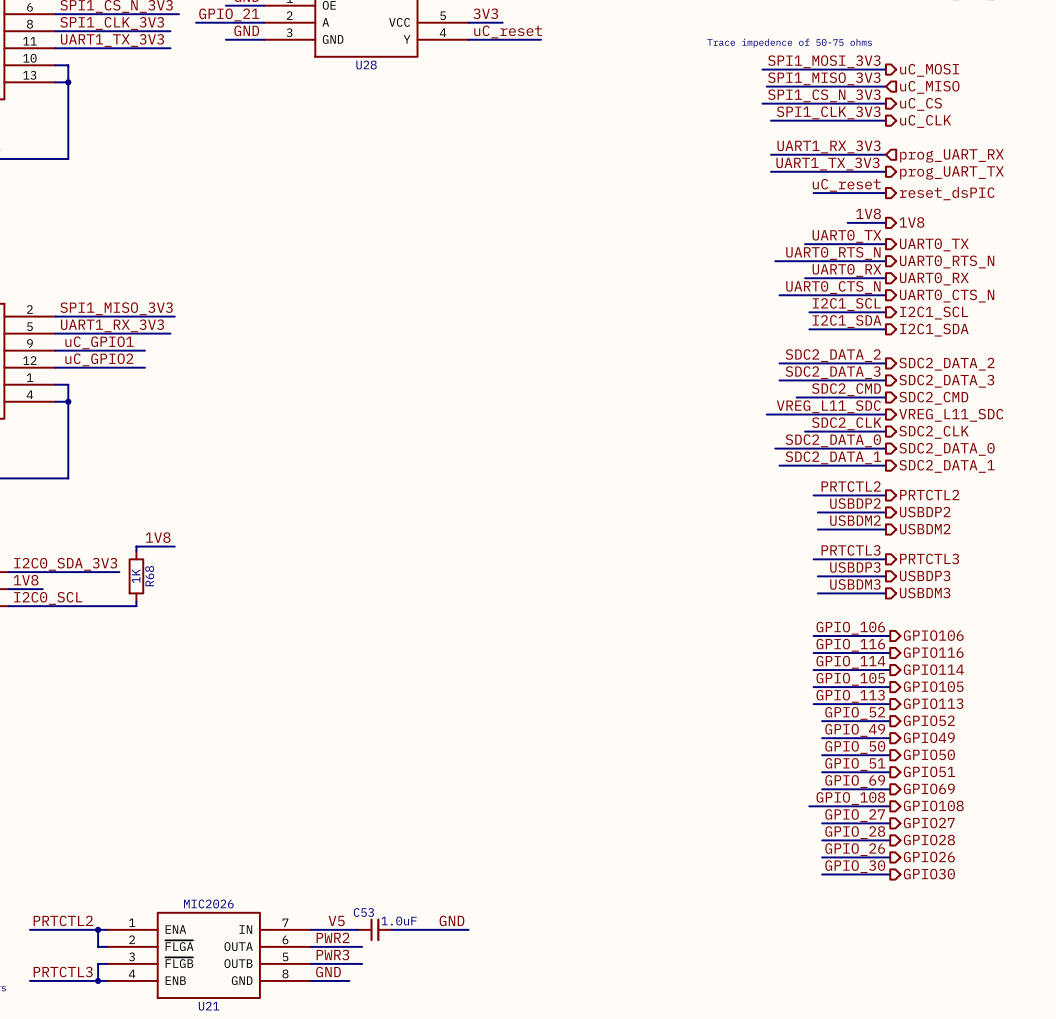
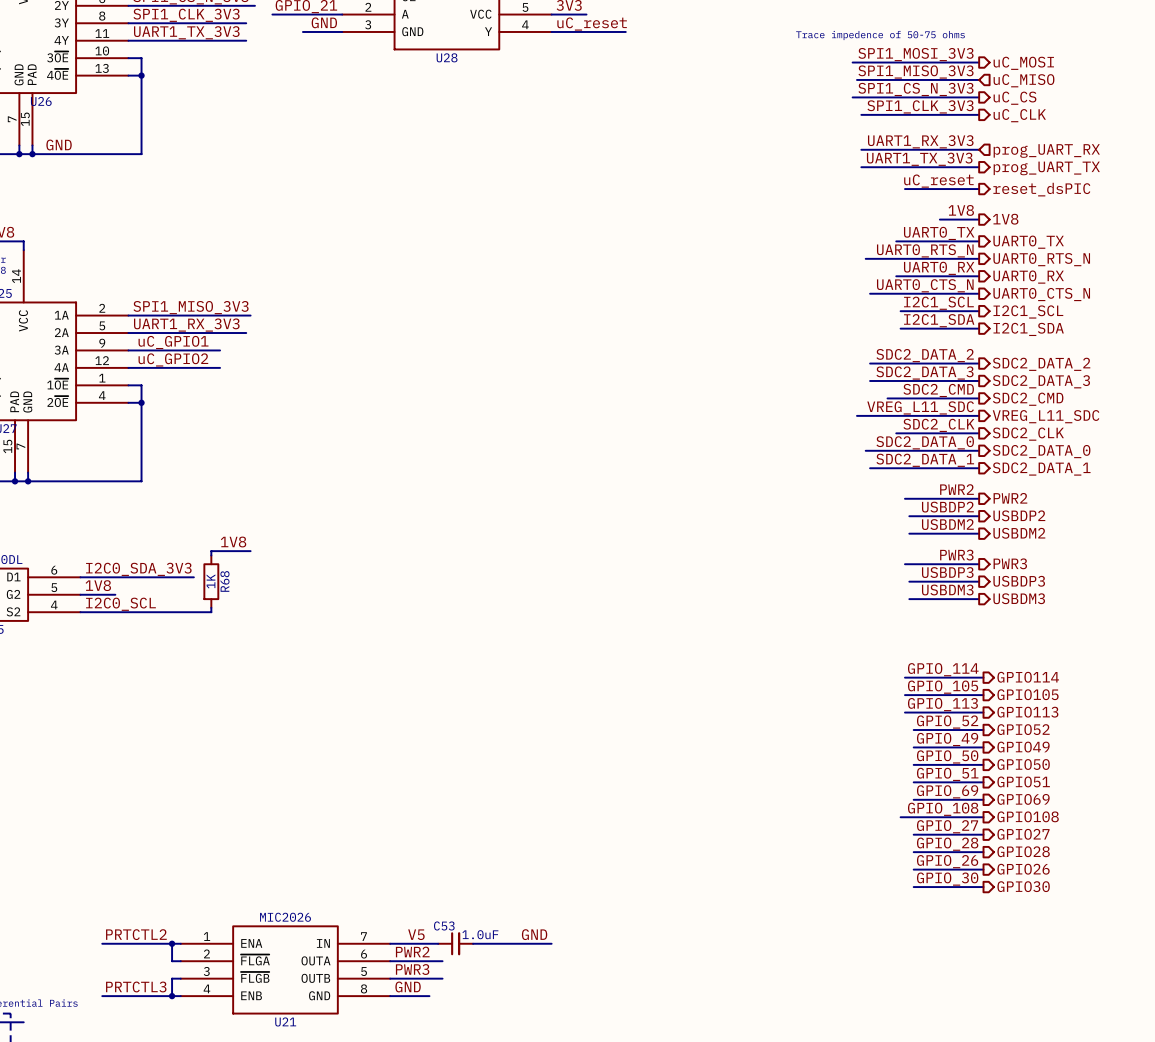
label: PRTCTL2 (851, 486) -> PWR2 (956, 489)
hierarchical label: PRTCTL2 (929, 495) -> PWR2 (1010, 498)
label: PRTCTL3 (851, 550) -> PWR3 (956, 555)
hierarchical label: PRTCTL3 (929, 558) -> PWR3 (1010, 563)
label: GPIO_106 (850, 628) -> none
wire: (813, 635) (890, 635) -> none
hierarchical label: GPIO106 (933, 635) -> none
label: GPIO_116 (850, 645) -> none
hierarchical label: GPIO116 (933, 652) -> none
wire: (813, 653) (890, 653) -> none

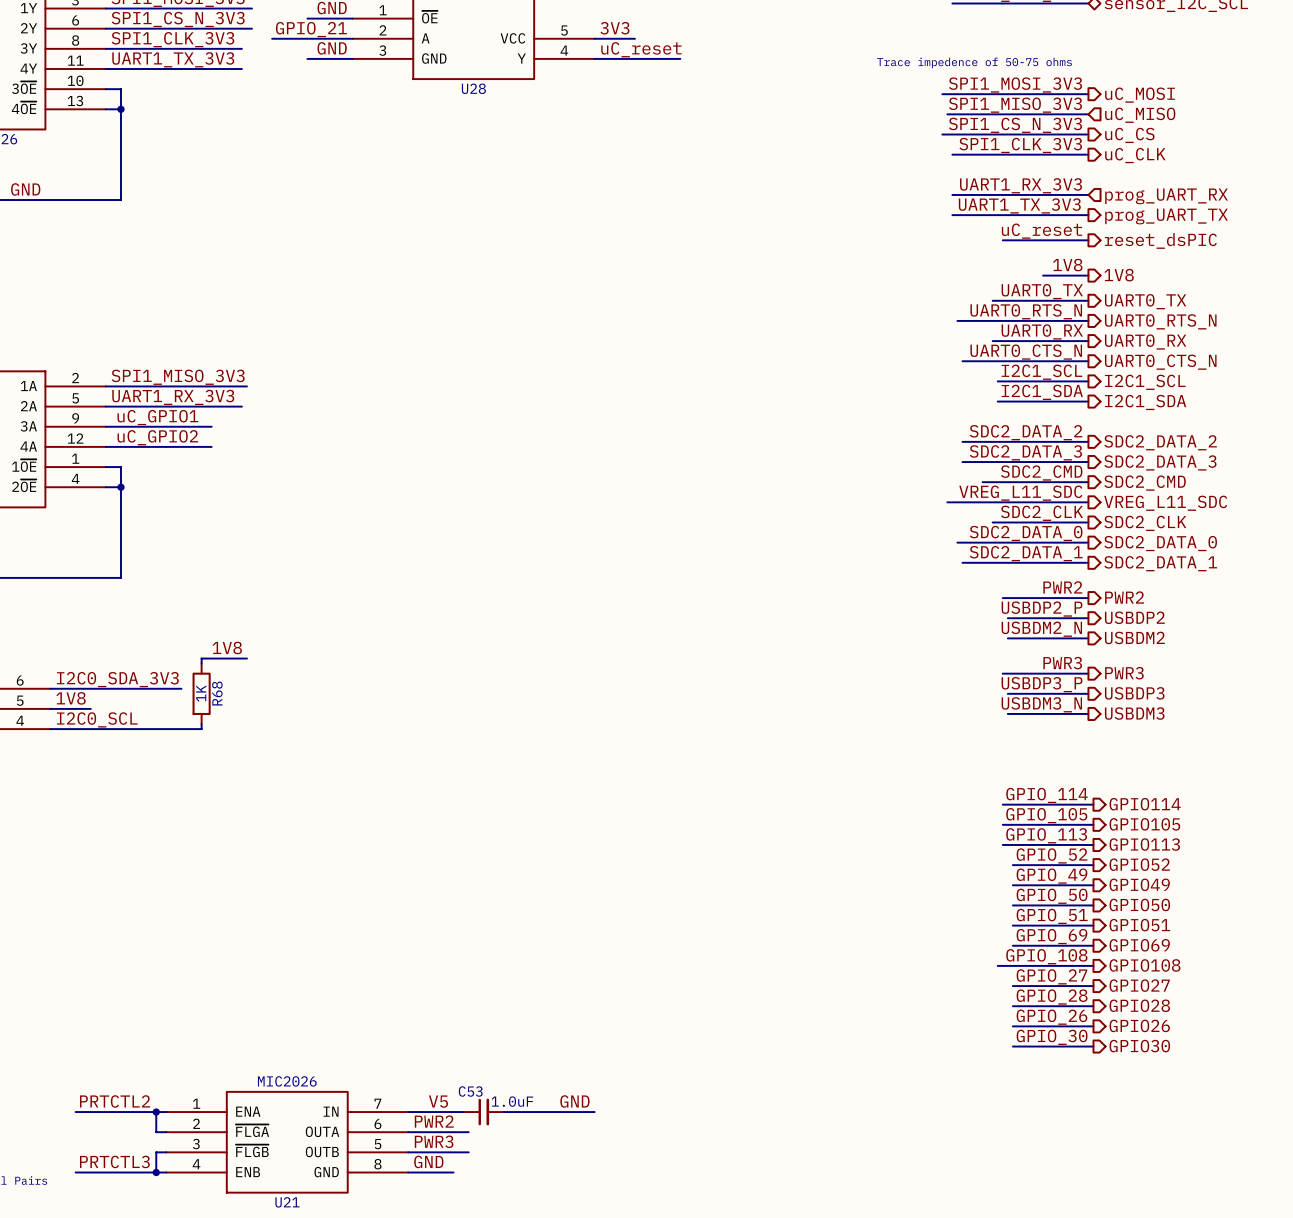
label: USBDP2 (947, 507) -> USBDP2_P (1042, 609)
label: USBDM2 (947, 524) -> USBDM2_N (1041, 629)
label: USBDP3 (947, 572) -> USBDP3_P (1042, 684)
label: USBDM3 (947, 589) -> USBDM3_N (1041, 704)

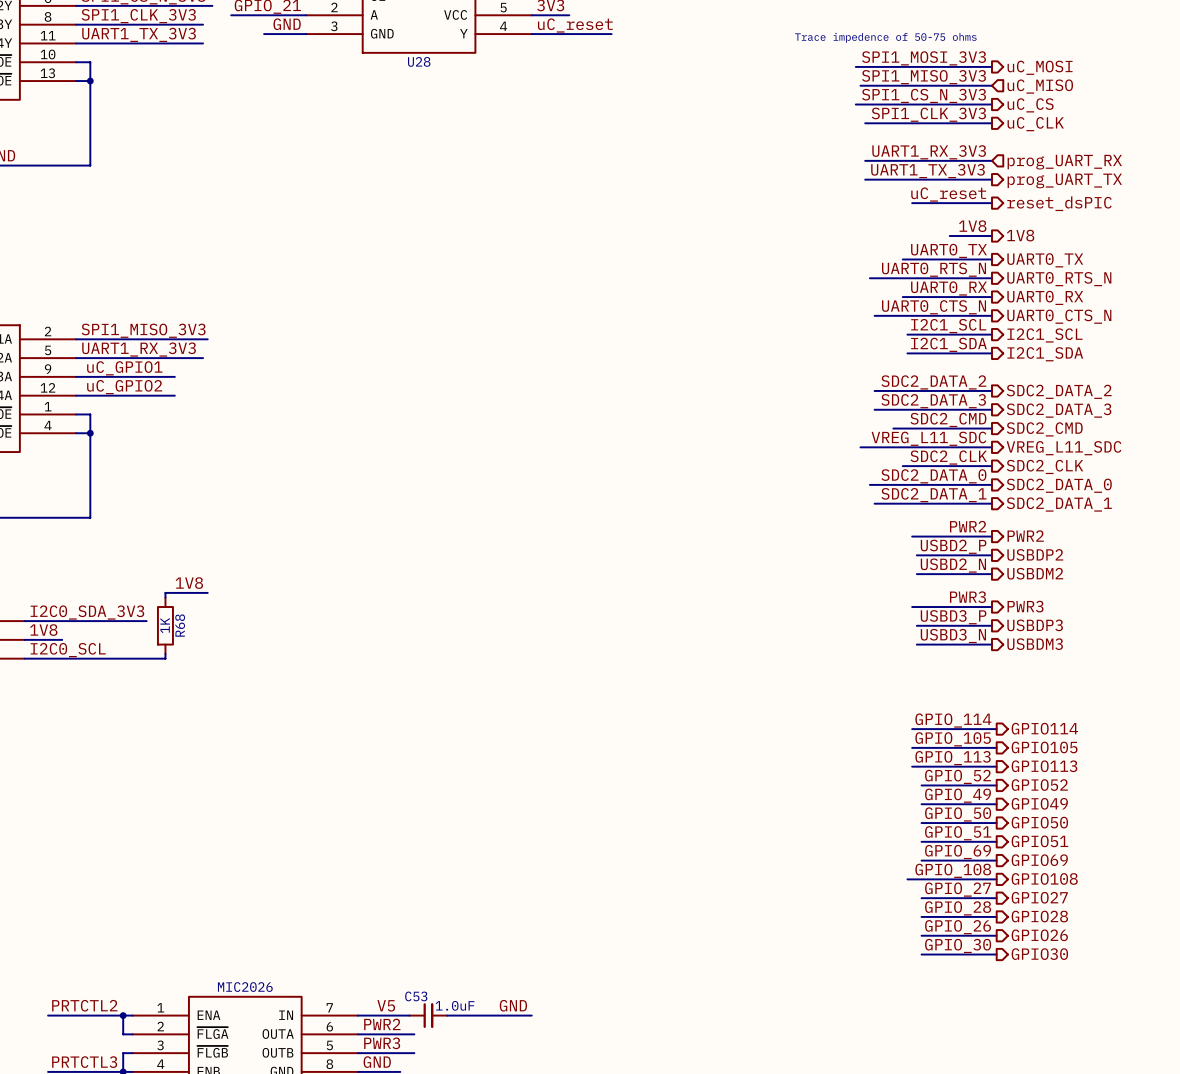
label: USBDP2_P (1042, 609) -> USBD2_P (953, 546)
label: USBDM2_N (1041, 629) -> USBD2_N (953, 565)
label: USBDP3_P (1042, 684) -> USBD3_P (953, 617)
label: USBDM3_N (1041, 704) -> USBD3_N (953, 636)

